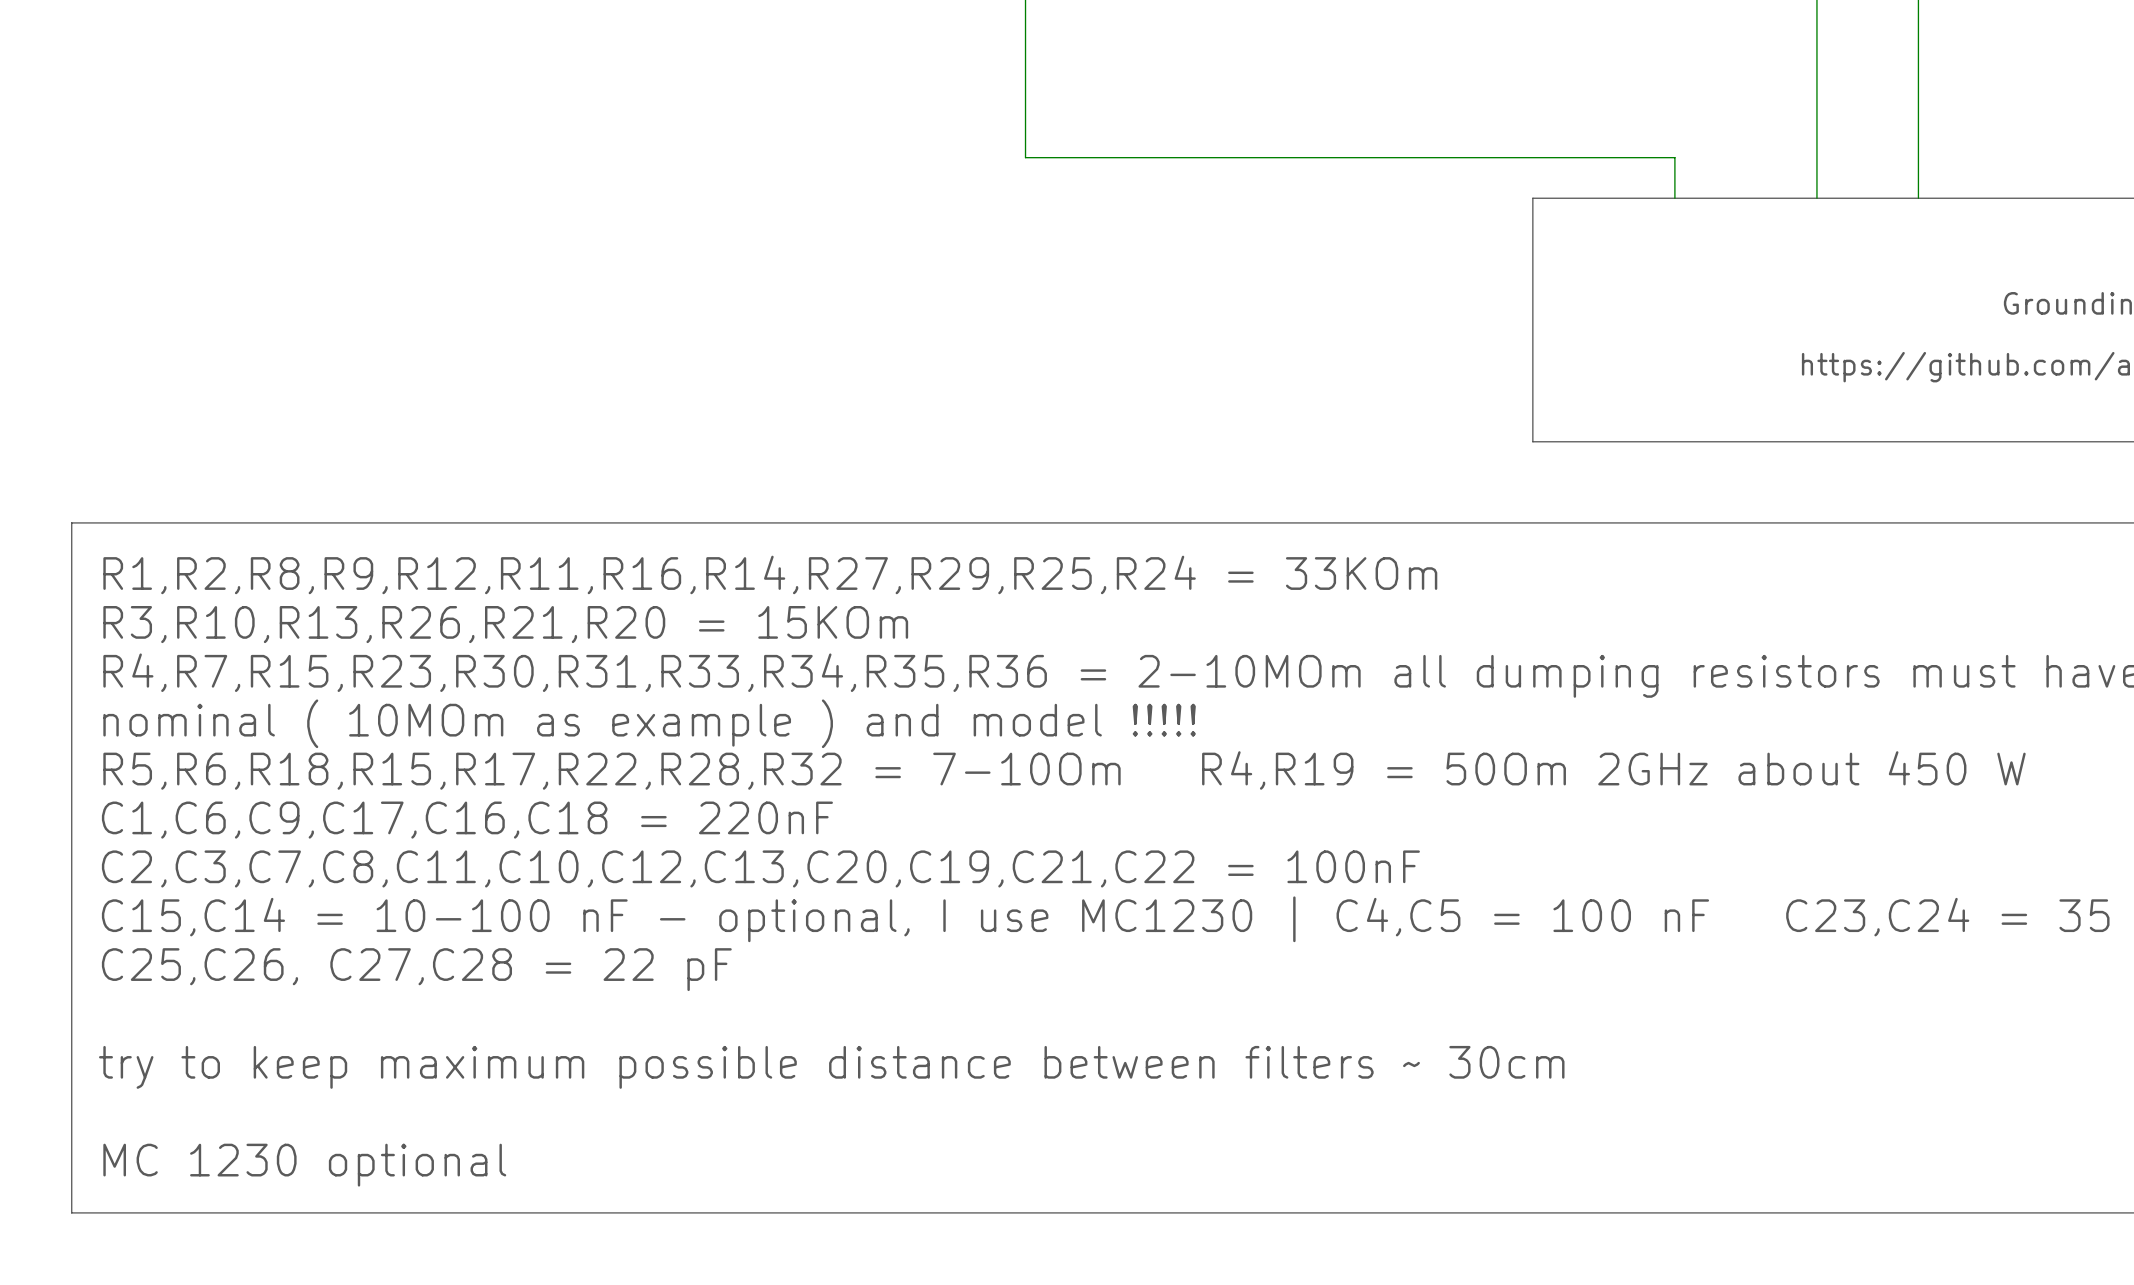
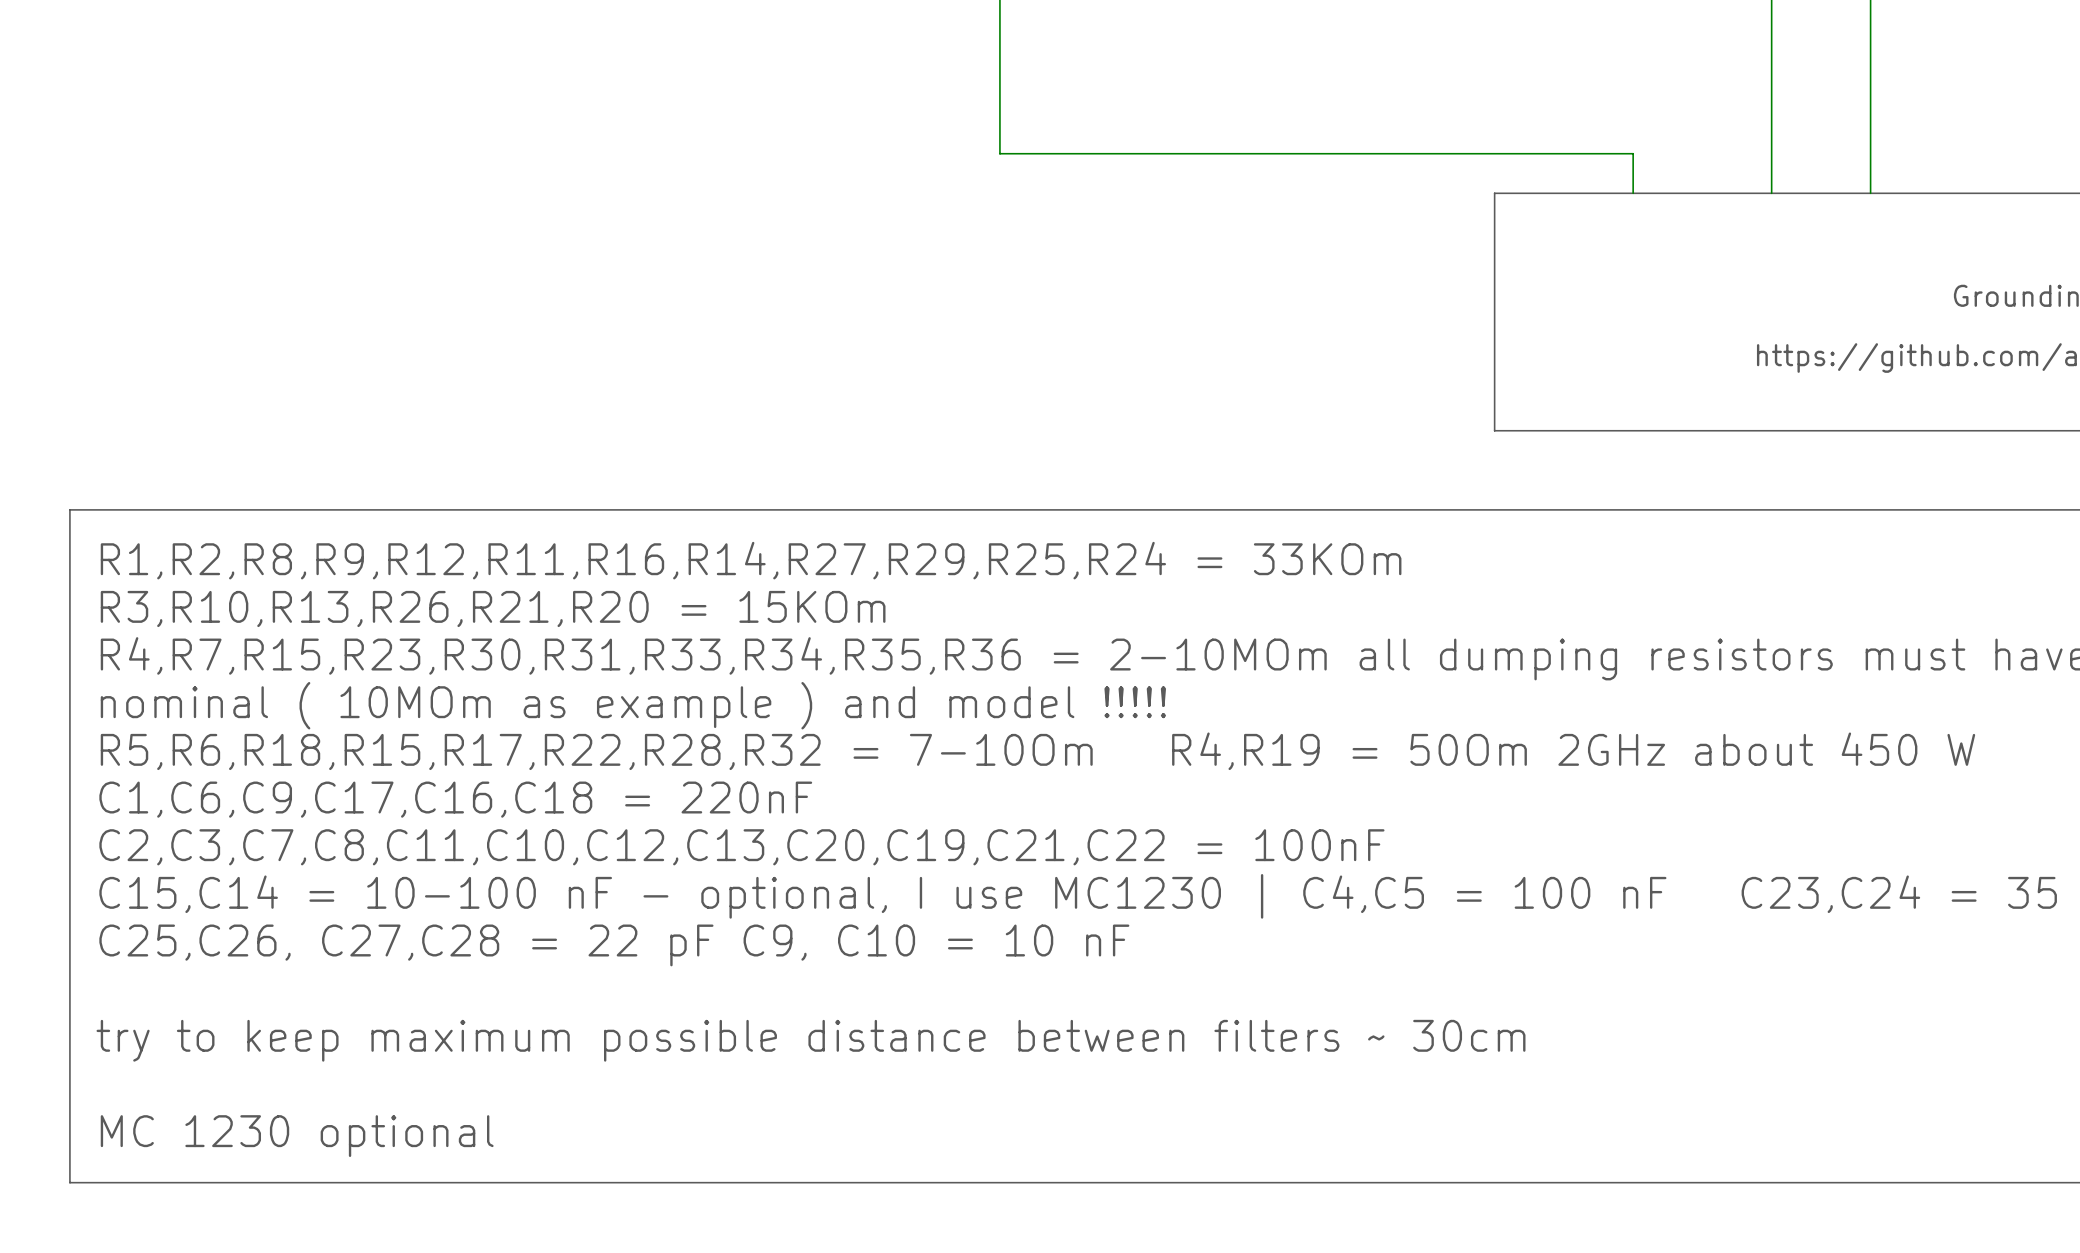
text: C25,C26, C27,C28 = 22 pF (416, 969) -> C25,C26, C27,C28 = 22 pF C9, C10 = 10 nF (614, 945)

